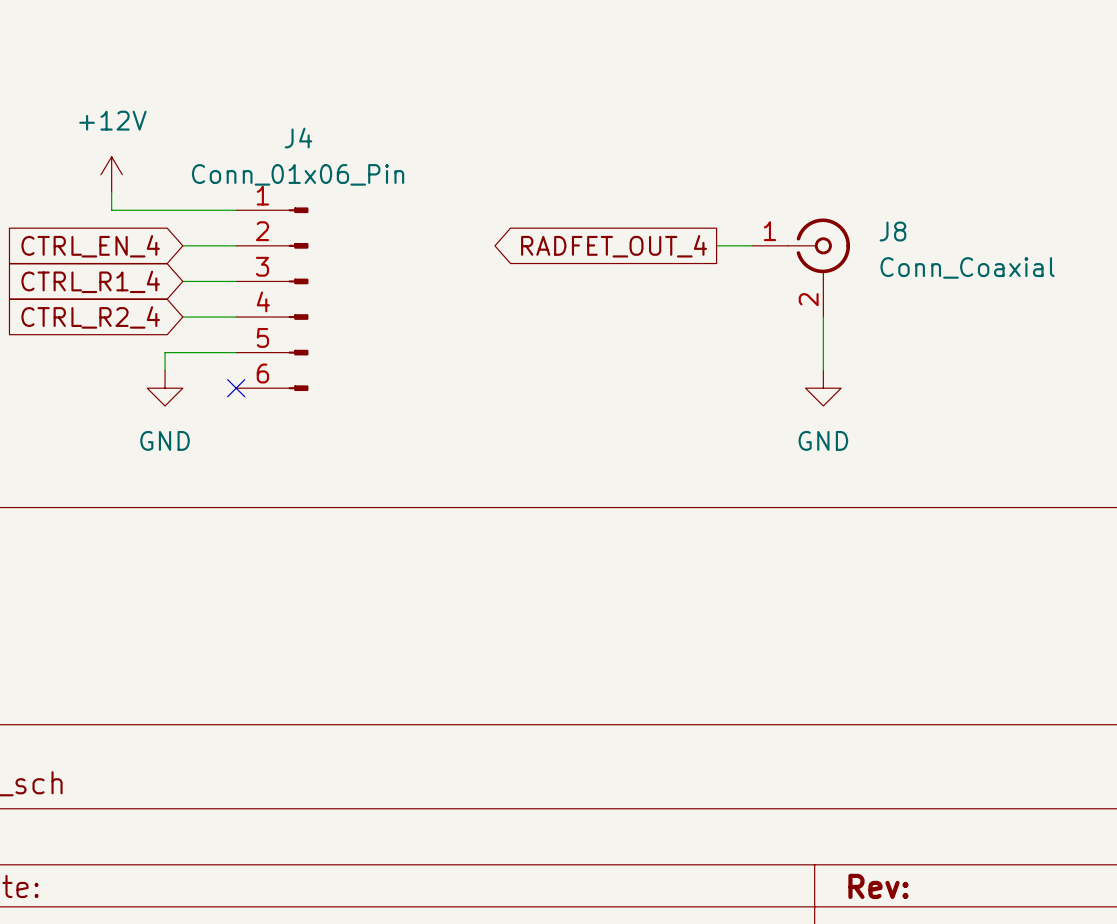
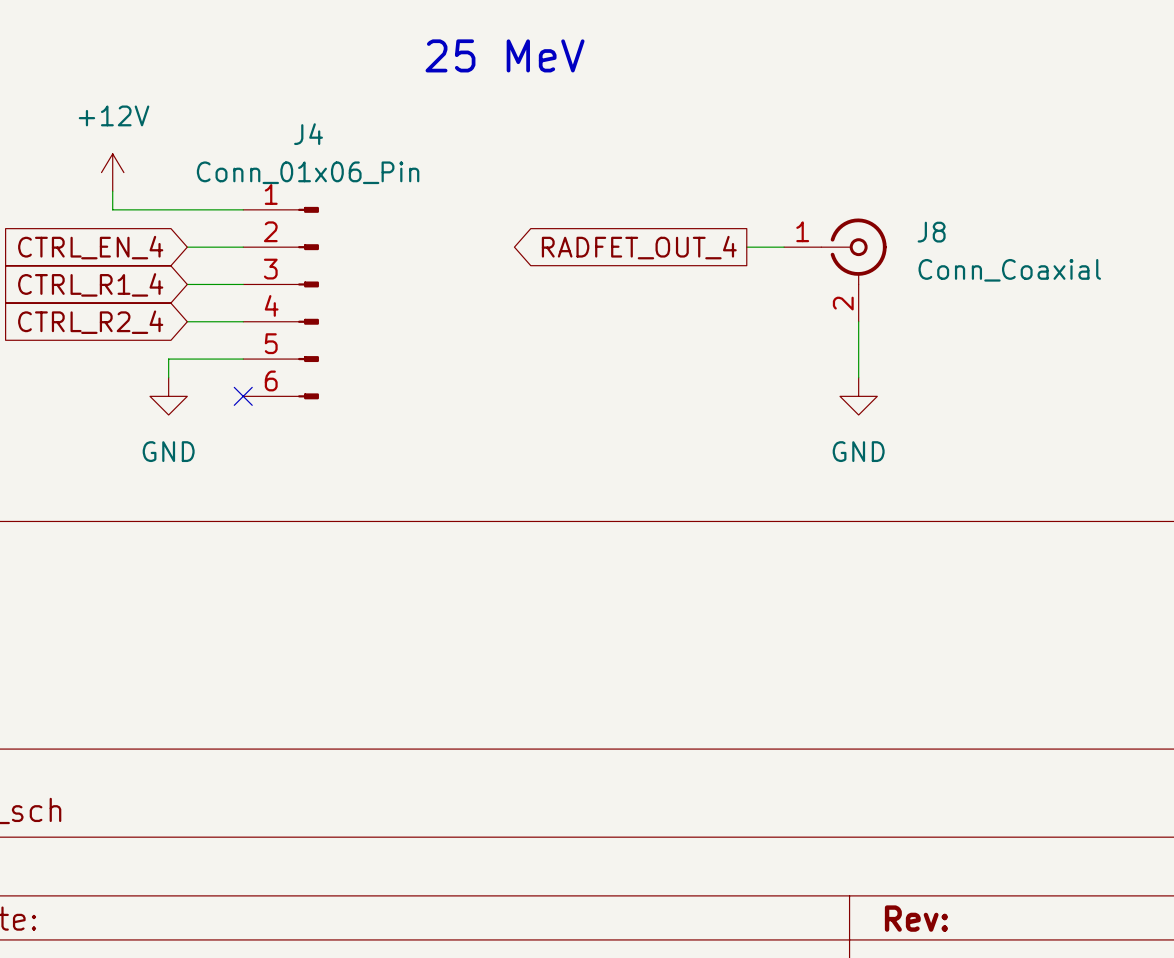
text: none -> 25 MeV (505, 55)

